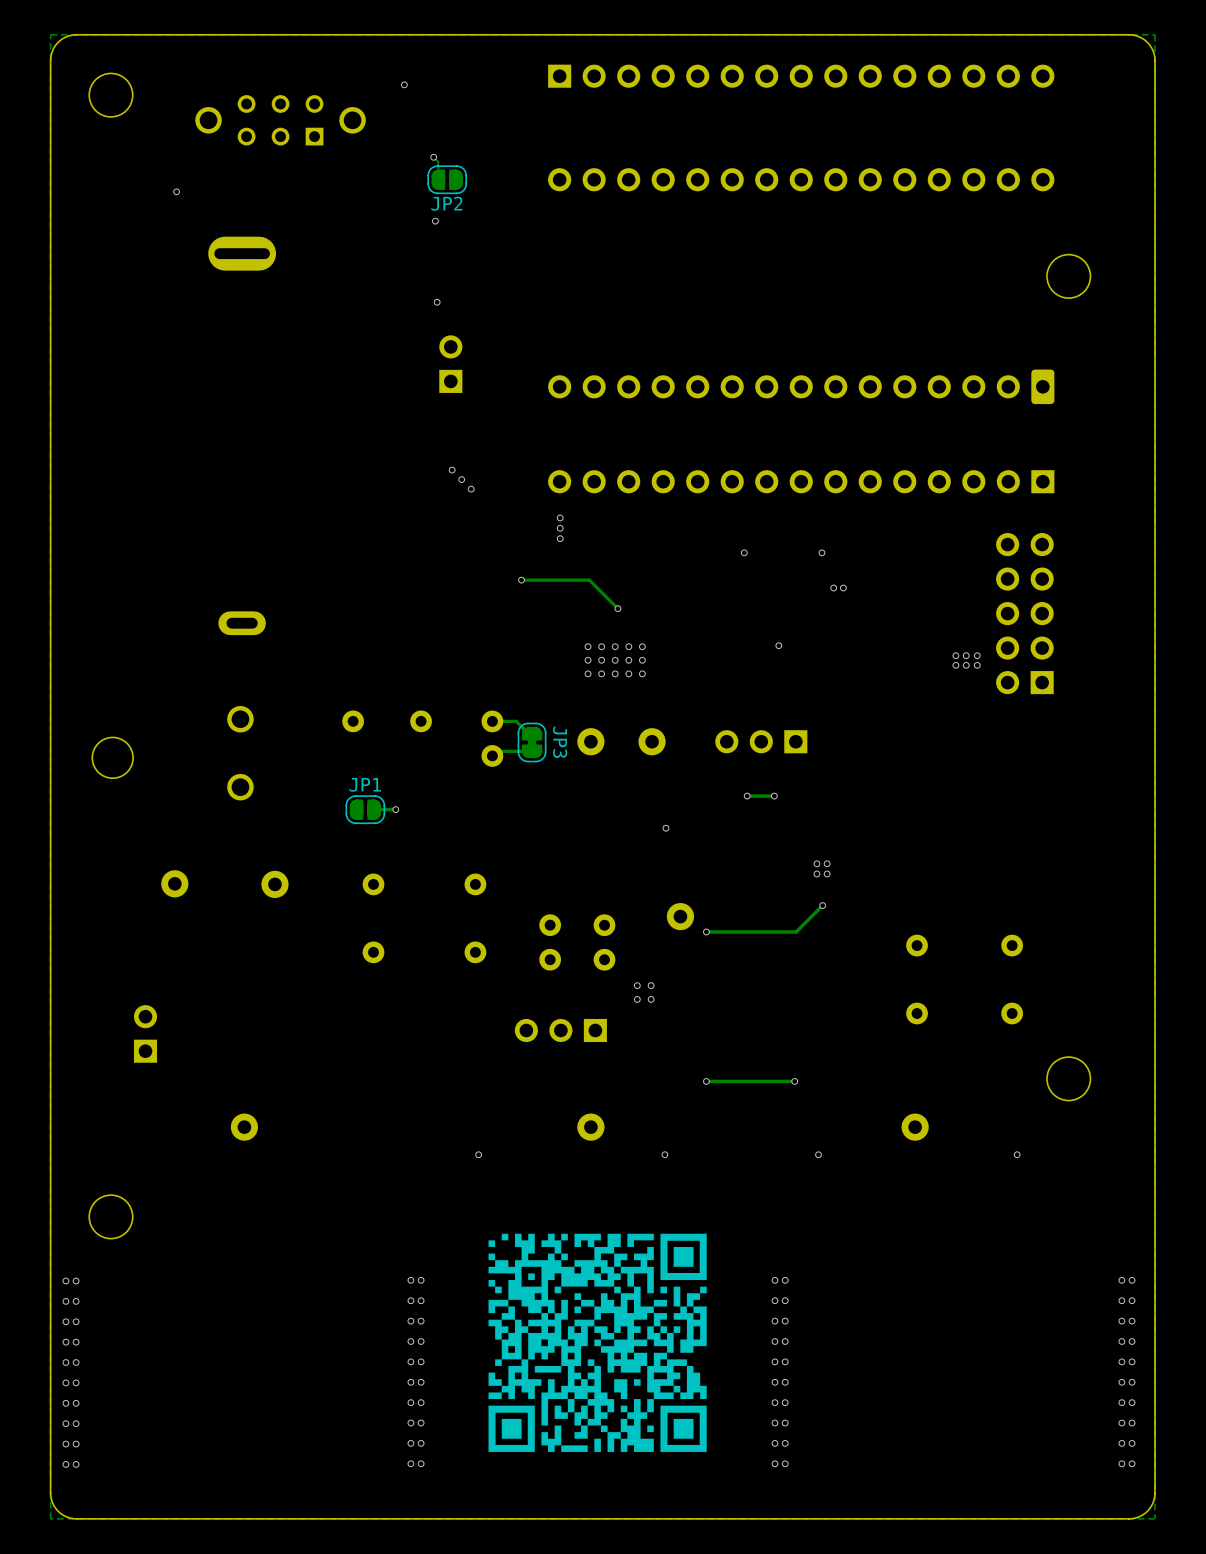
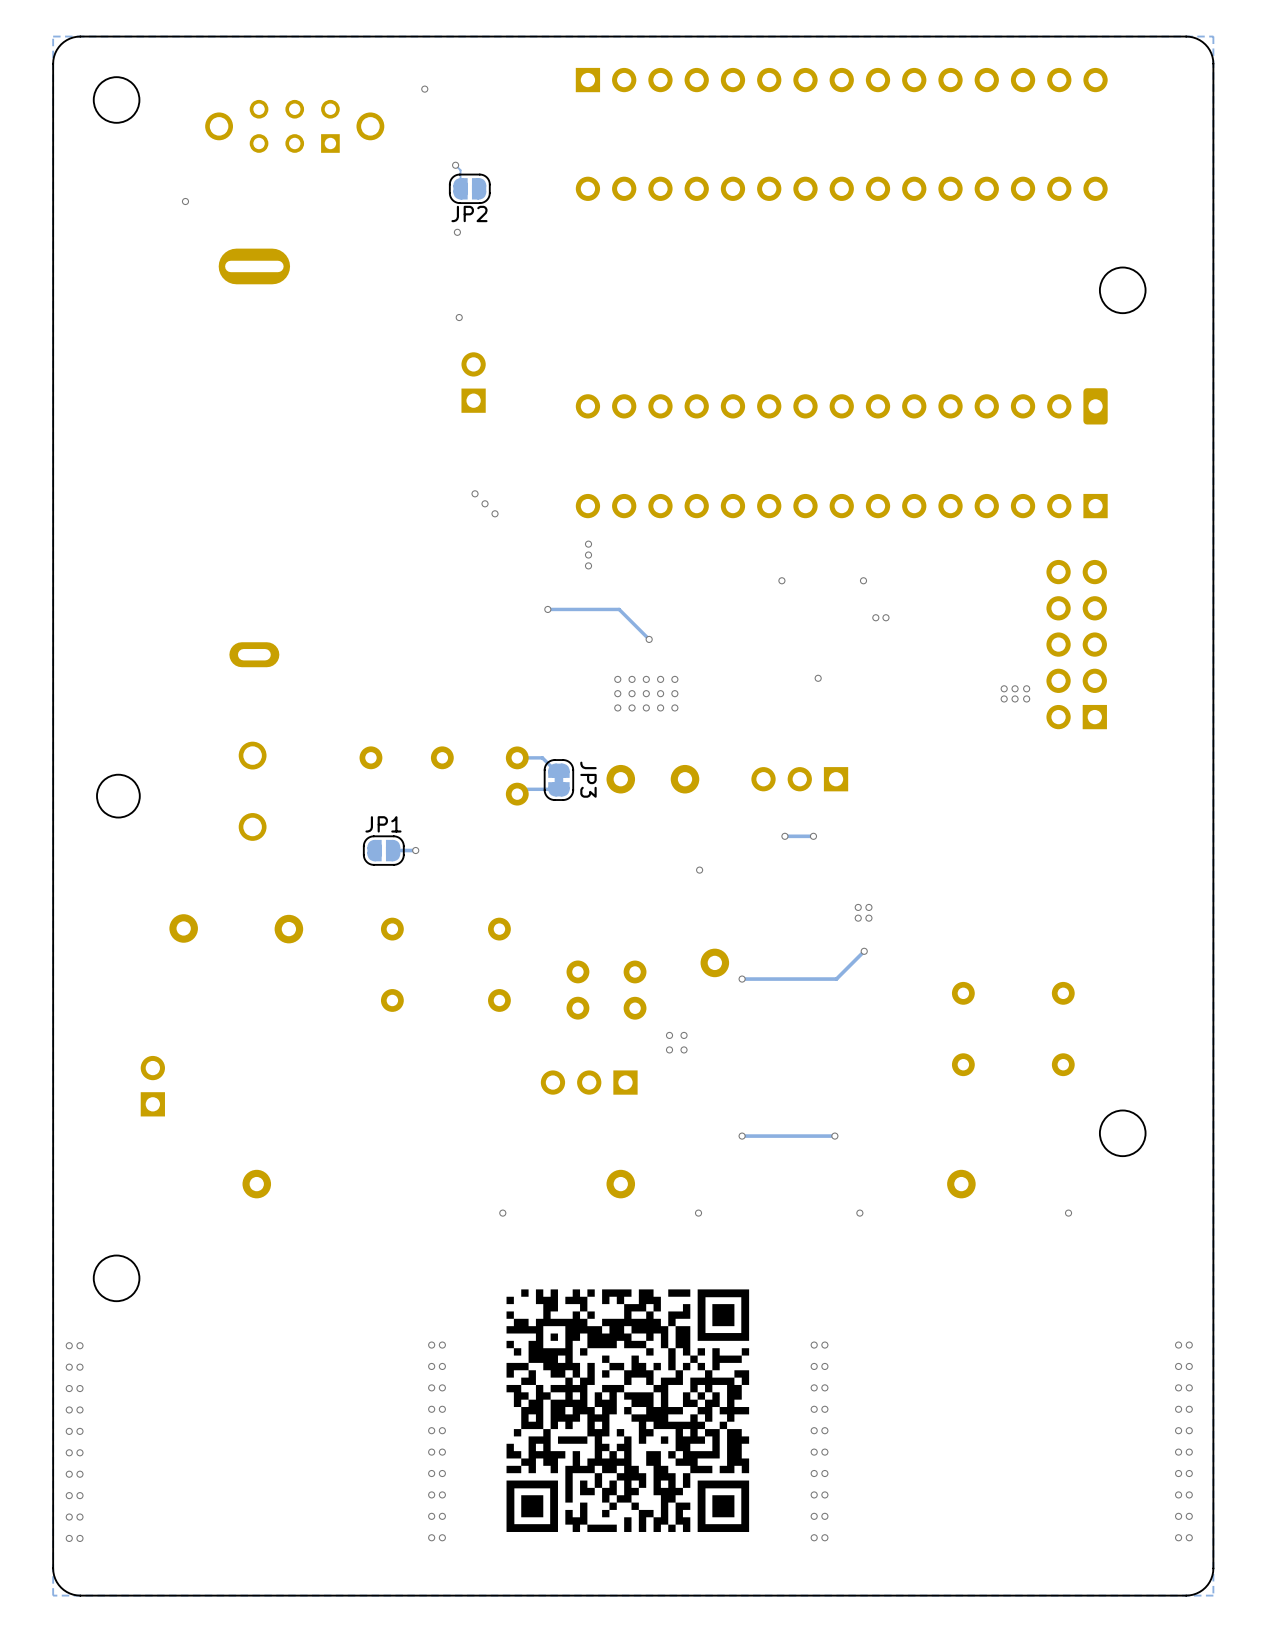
drawing shape: [488, 1233, 707, 1452] -> [506, 1289, 750, 1532]

